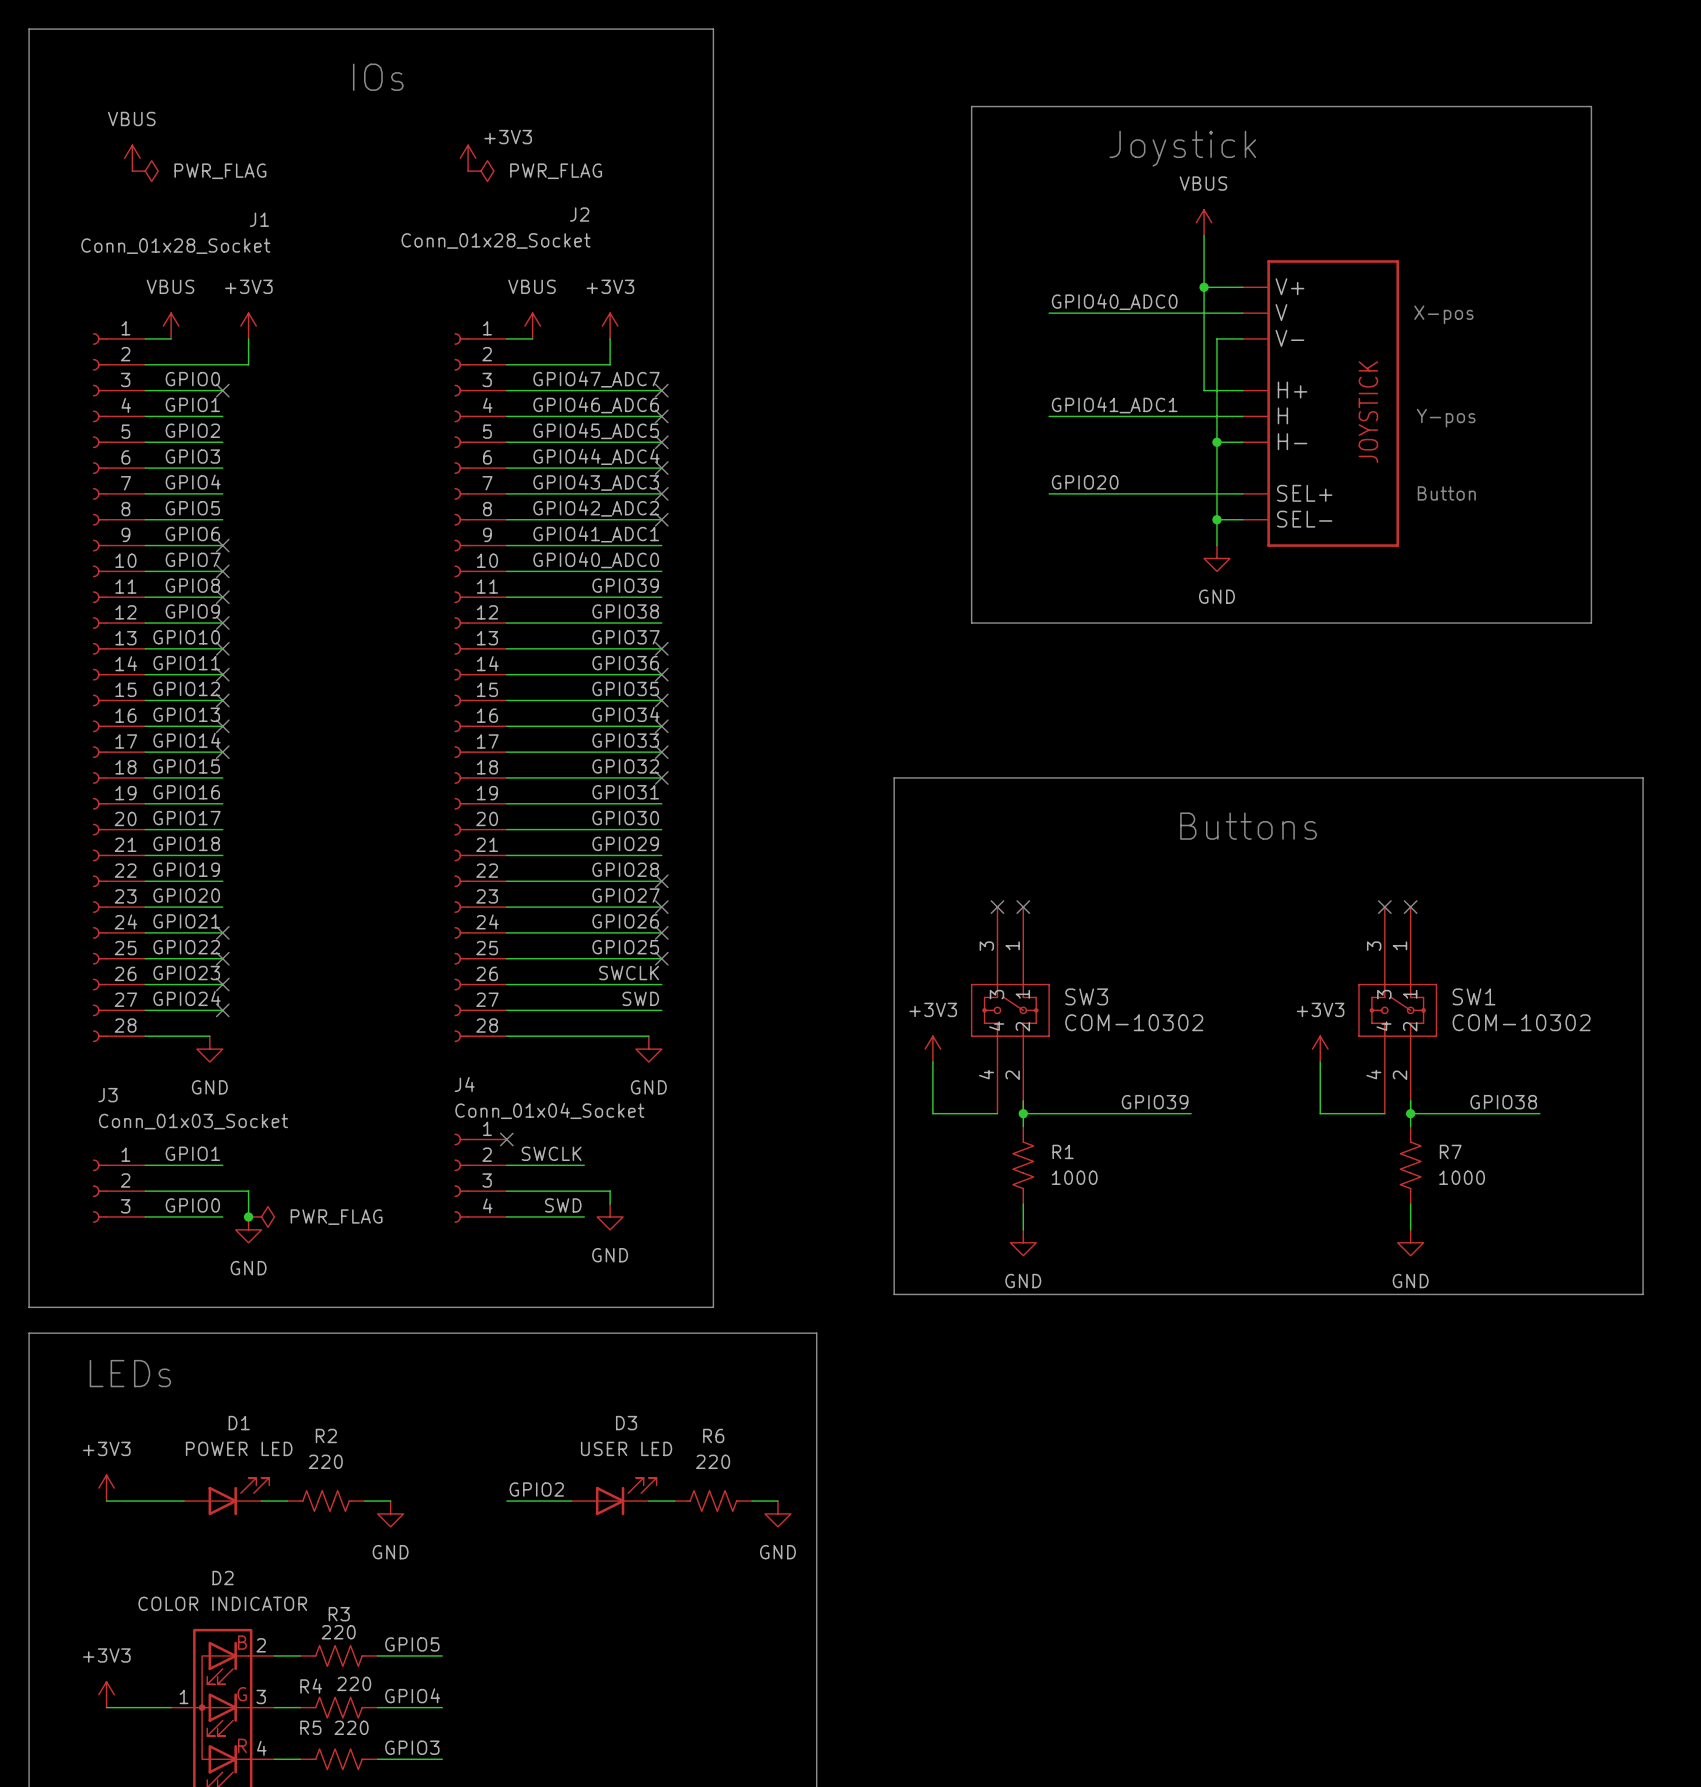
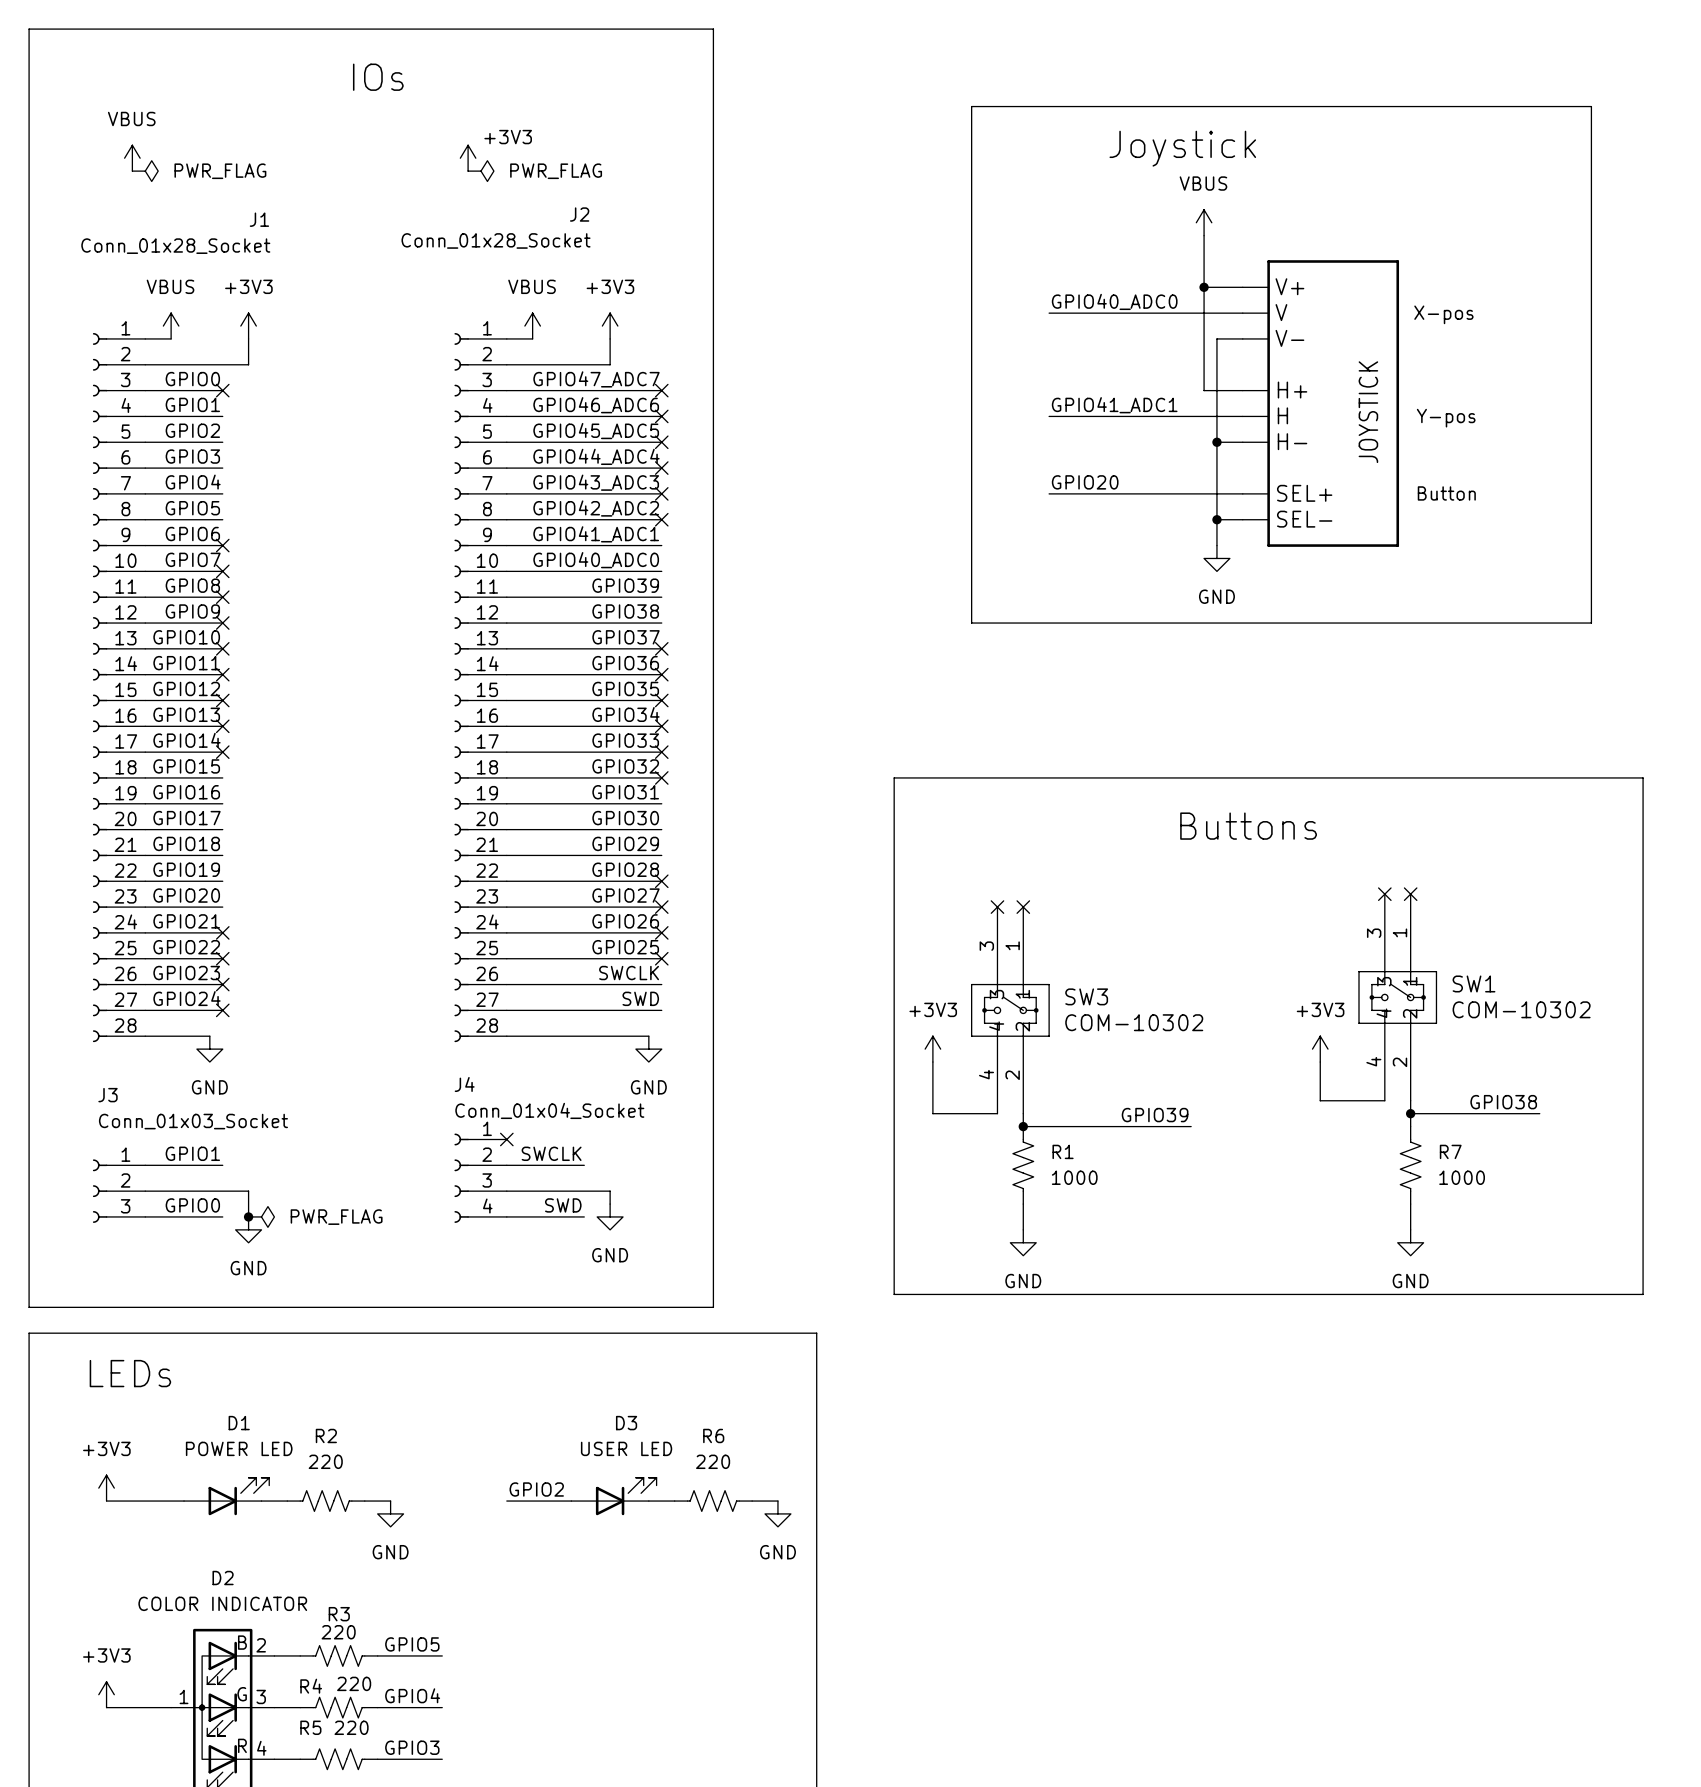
no-connect mark position: (1384, 907) -> (1384, 894)
no-connect mark position: (1410, 907) -> (1410, 894)
SW1 position: (1397, 1010) -> (1397, 997)
wire: (1023, 1100) (1023, 1113) (1191, 1113) -> none
wire: (1320, 1100) (1320, 1113) (1384, 1113) -> (1320, 1100) (1384, 1100)
label position: GPIO39 (1155, 1102) -> GPIO39 (1155, 1115)
junction position: (1023, 1113) -> (1023, 1126)
wire: none -> (1023, 1126) (1191, 1126)

